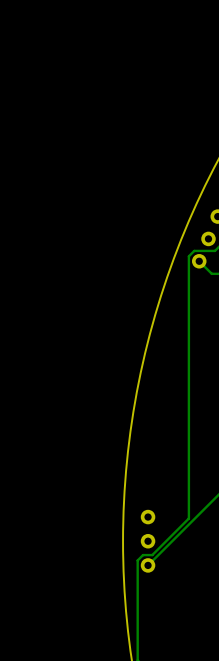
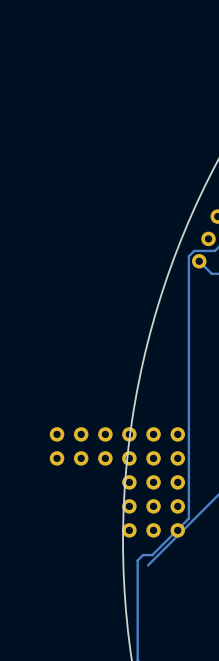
part: none -> (81, 434)
part: none -> (153, 434)
part: none -> (81, 458)
part: none -> (153, 458)
part: none -> (153, 482)
part: none -> (153, 506)
part rotation: 0° (148, 541) -> 90° clockwise (153, 530)

